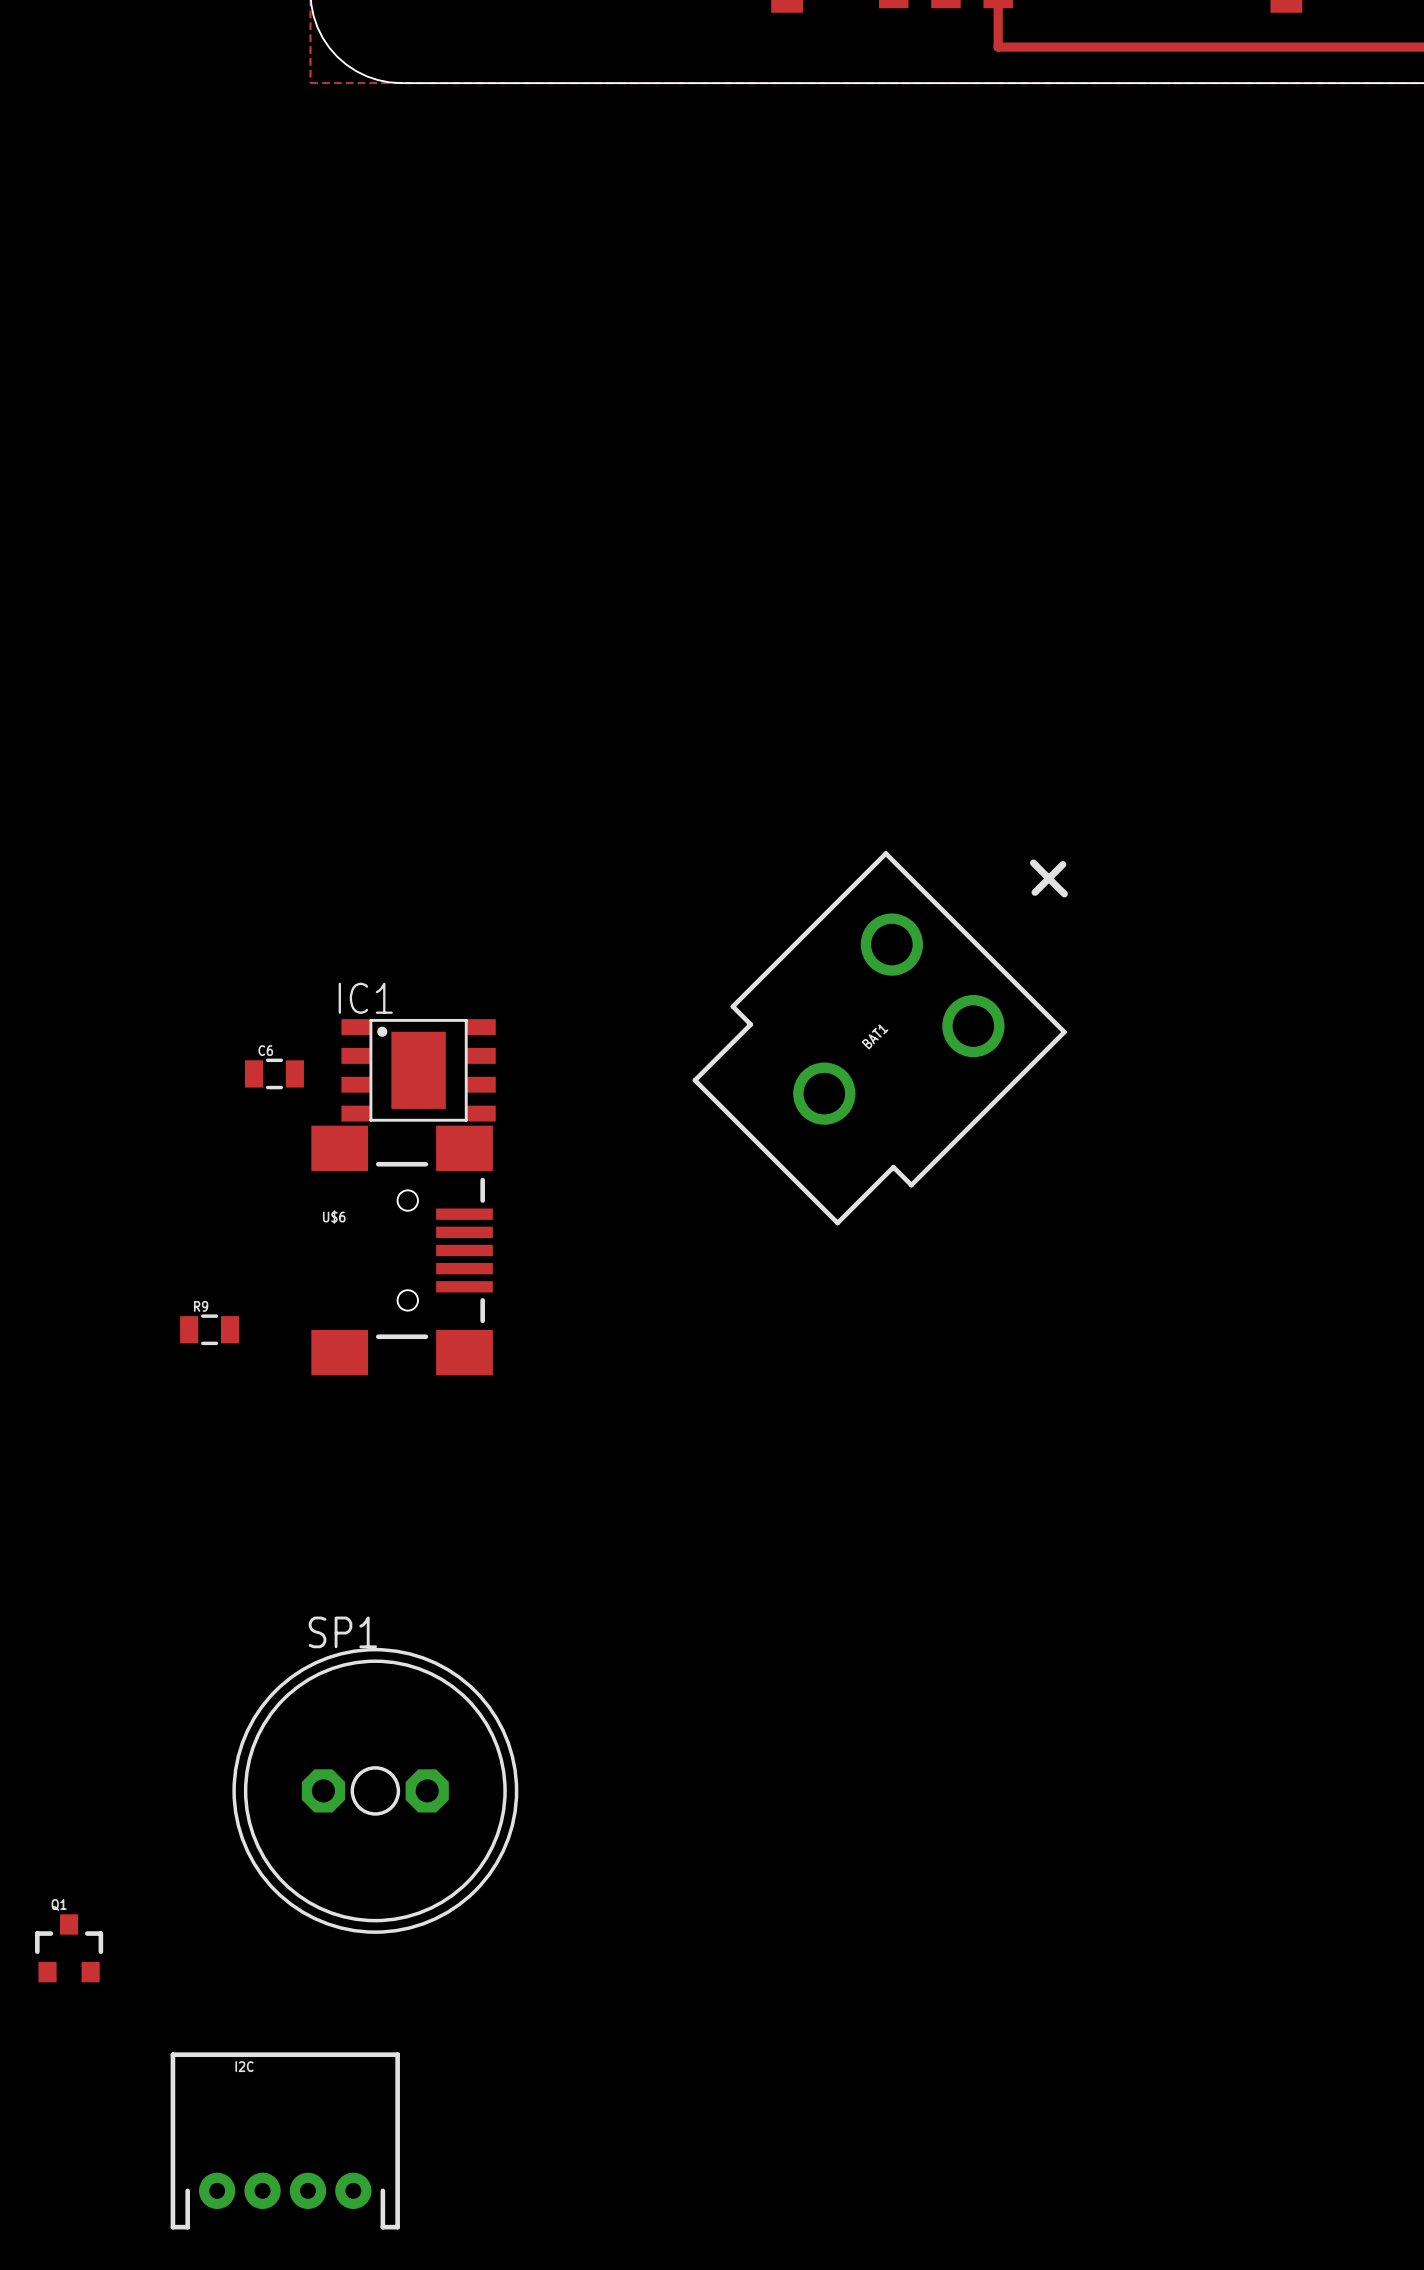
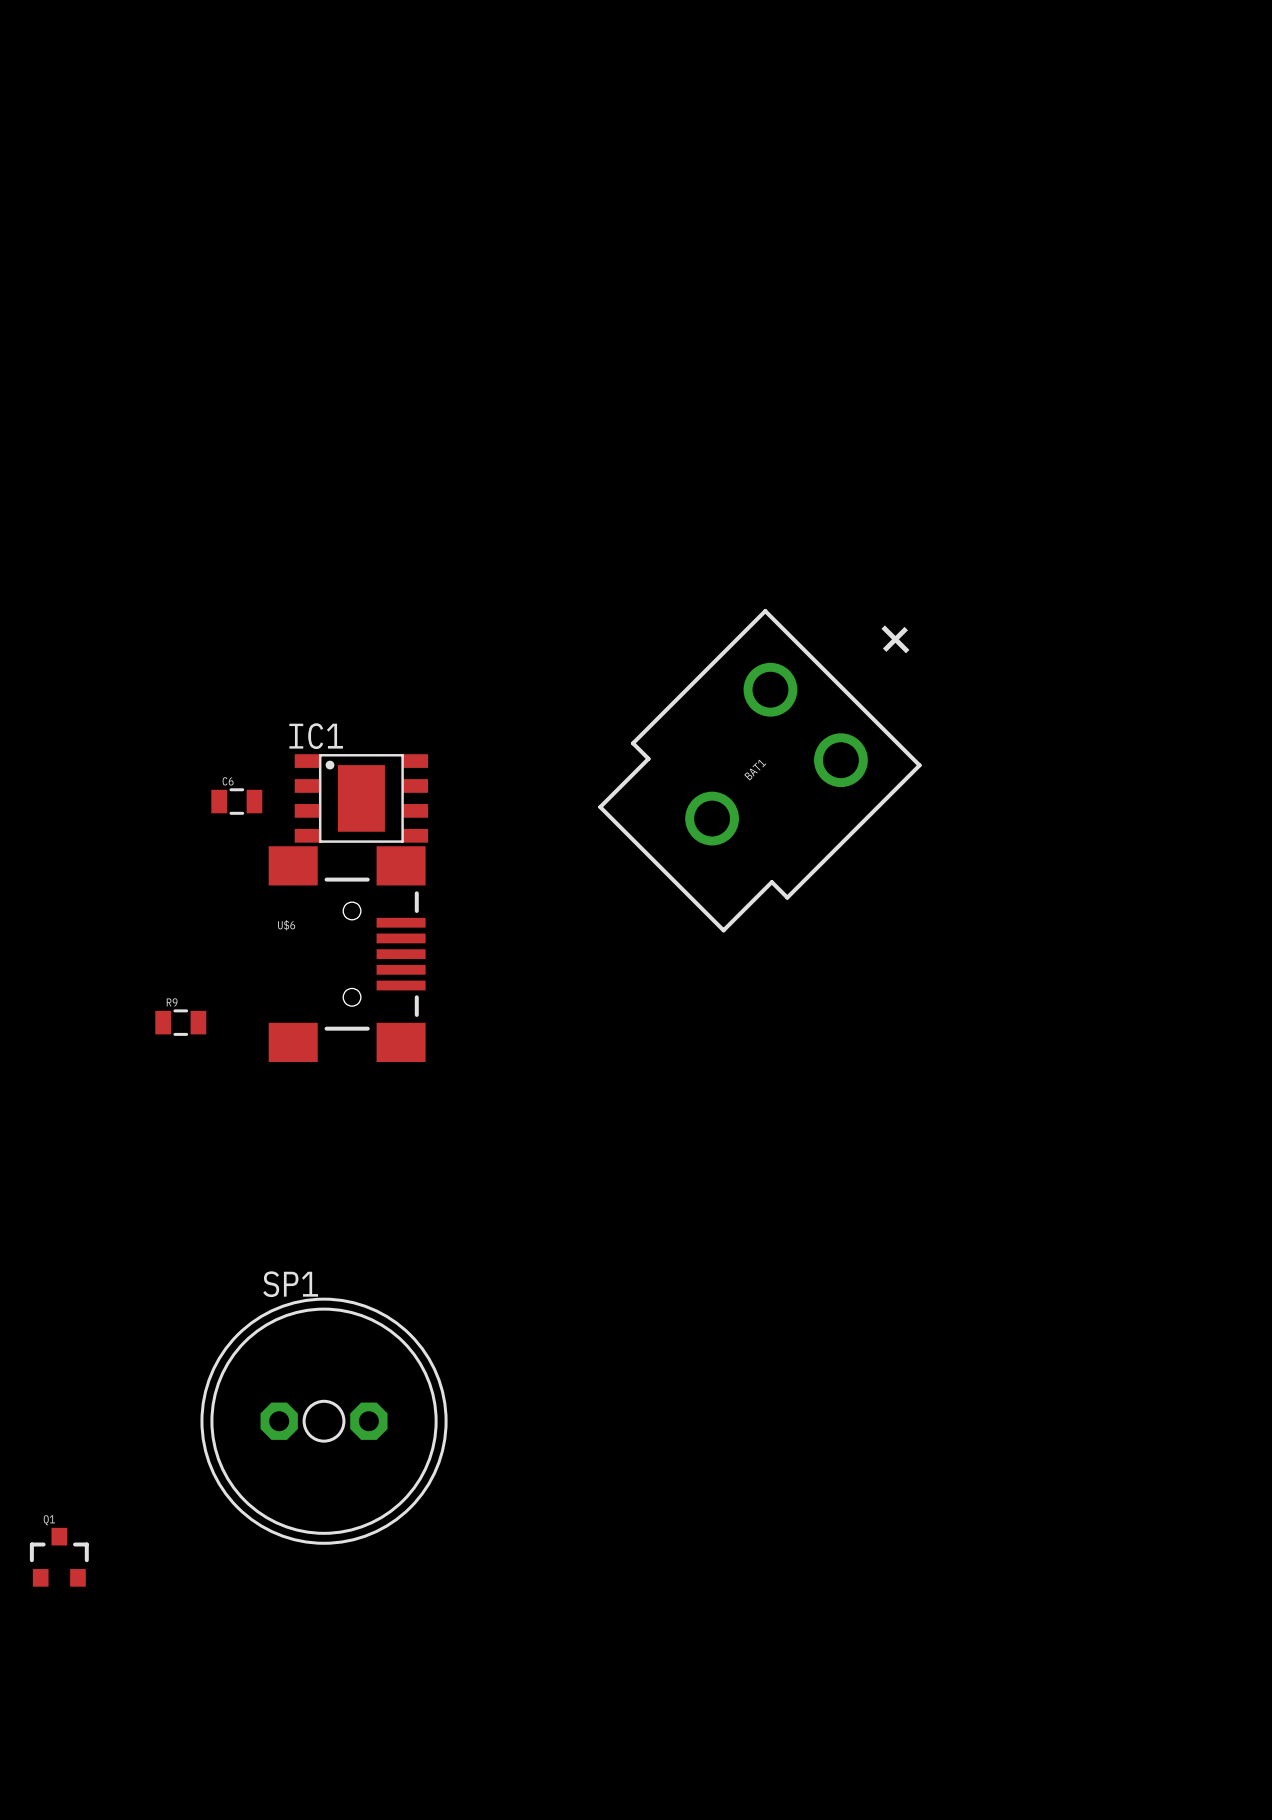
I2C: (285, 2140) -> none

